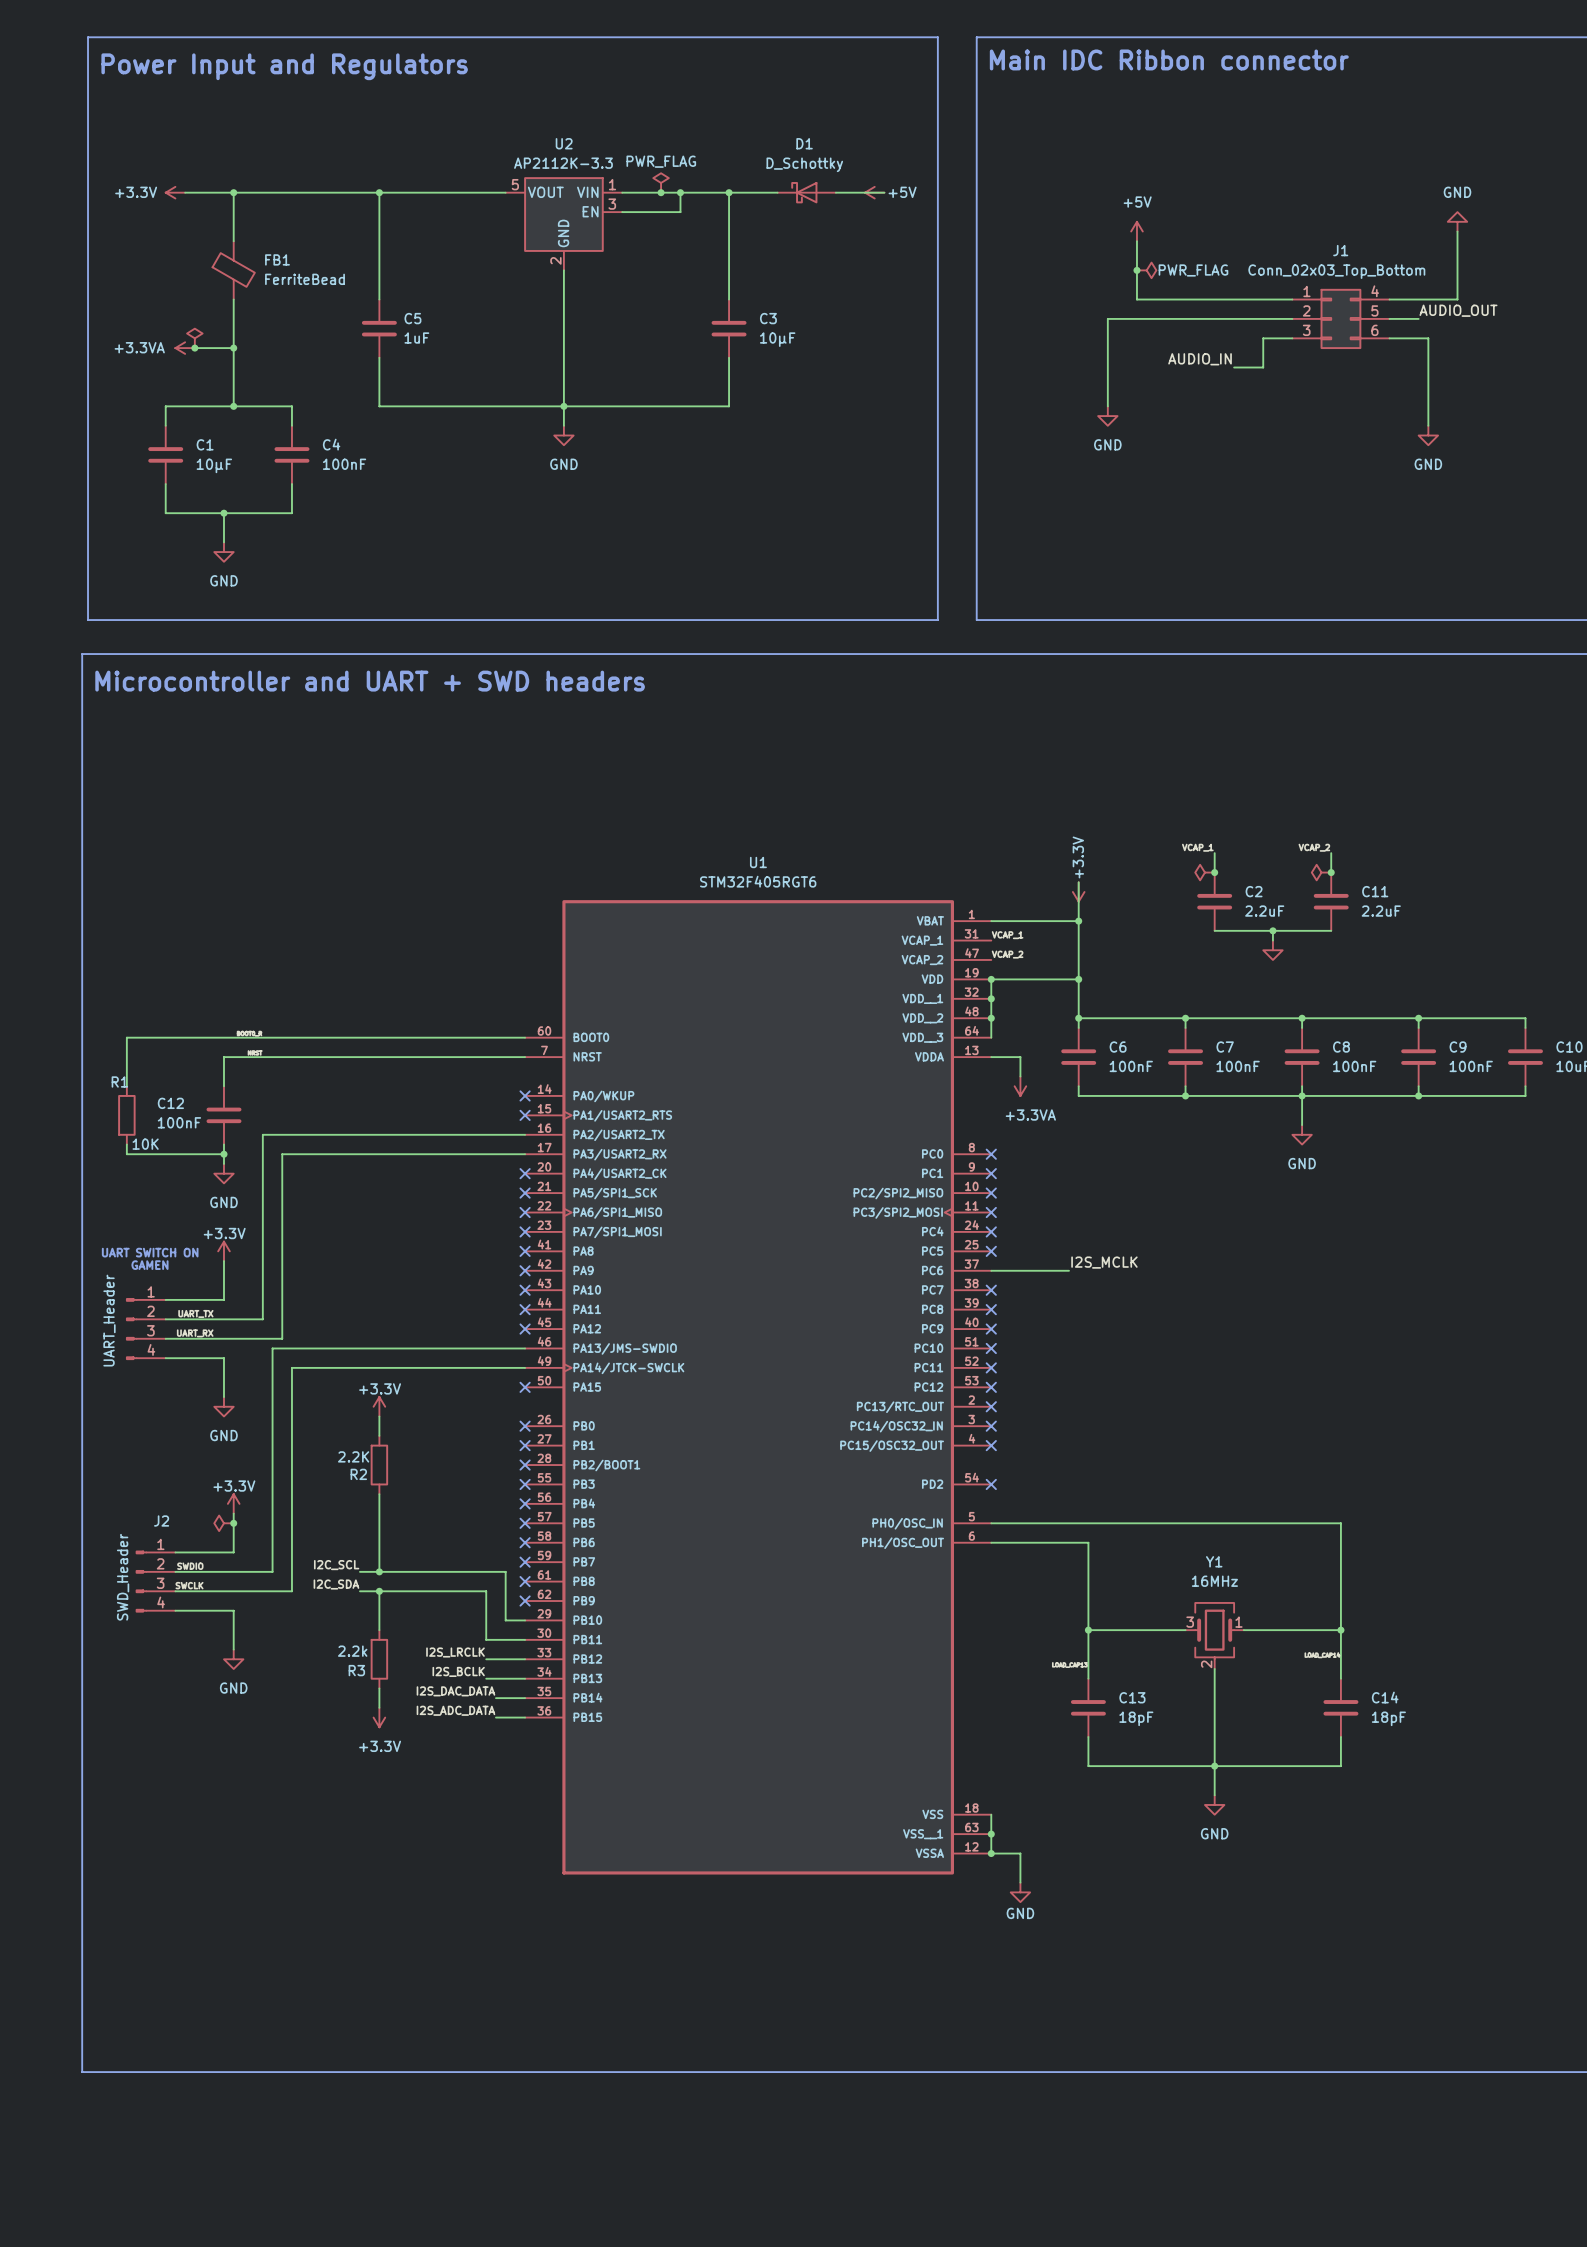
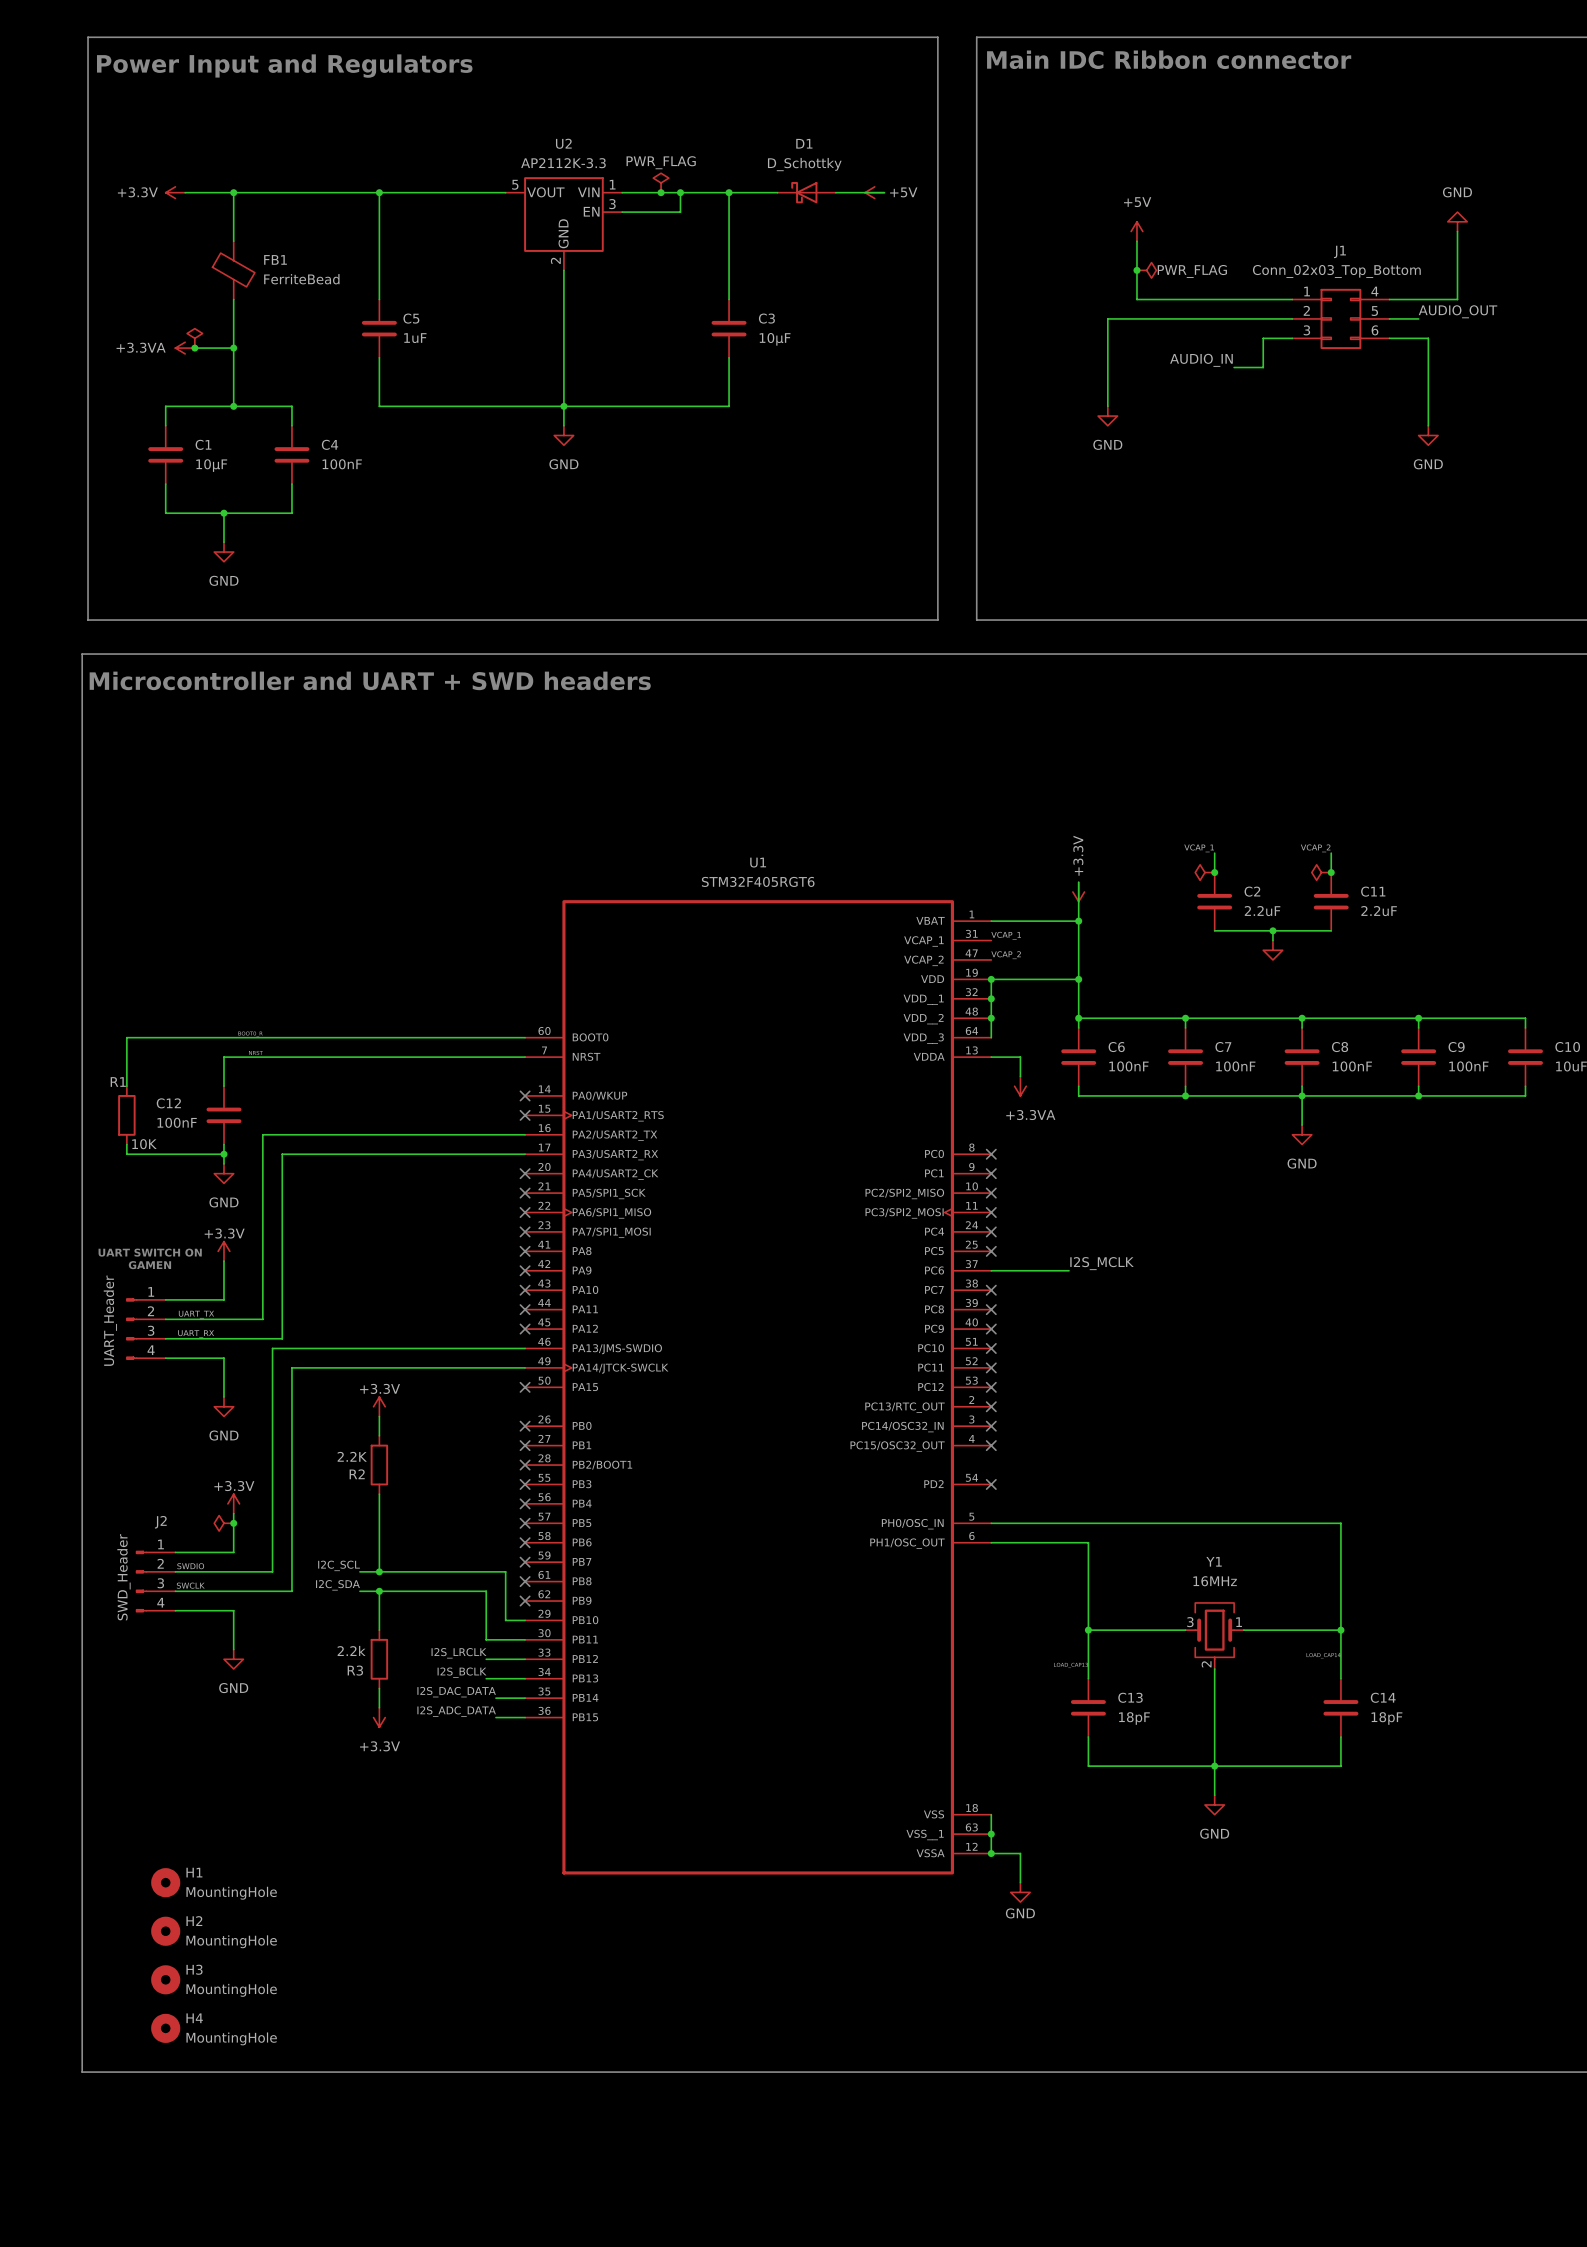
H1: none -> MountingHole (165, 1882)
H2: none -> MountingHole (165, 1931)
H3: none -> MountingHole (165, 1979)
H4: none -> MountingHole (165, 2028)

